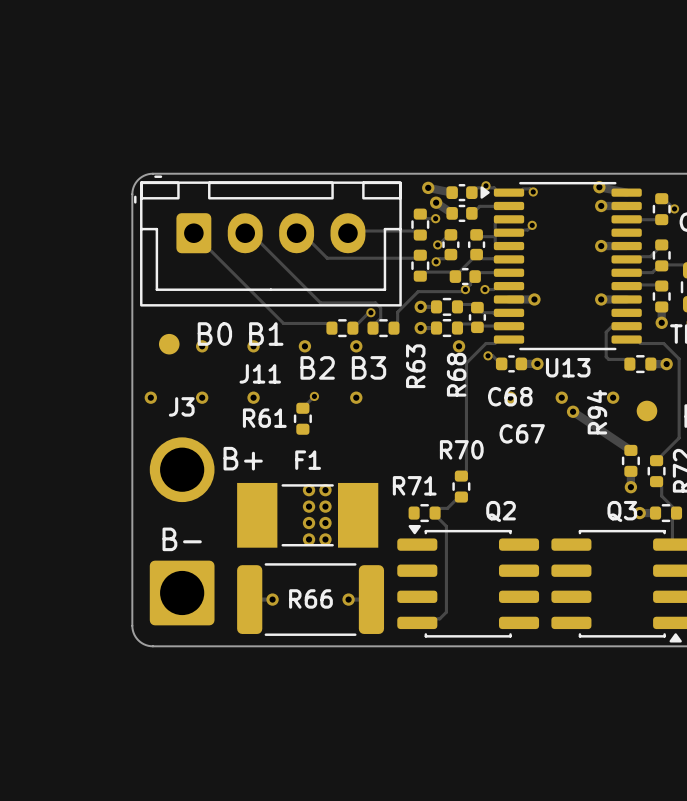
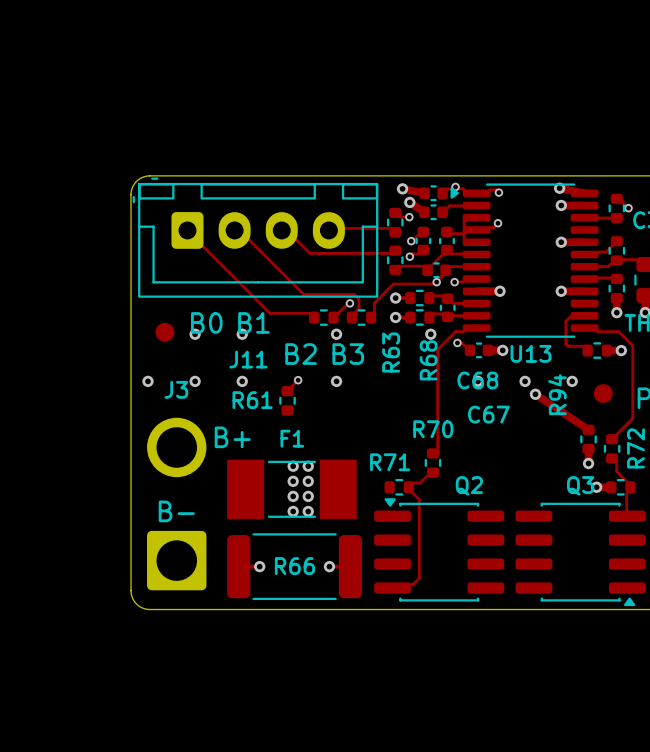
via: (304, 346) -> none

